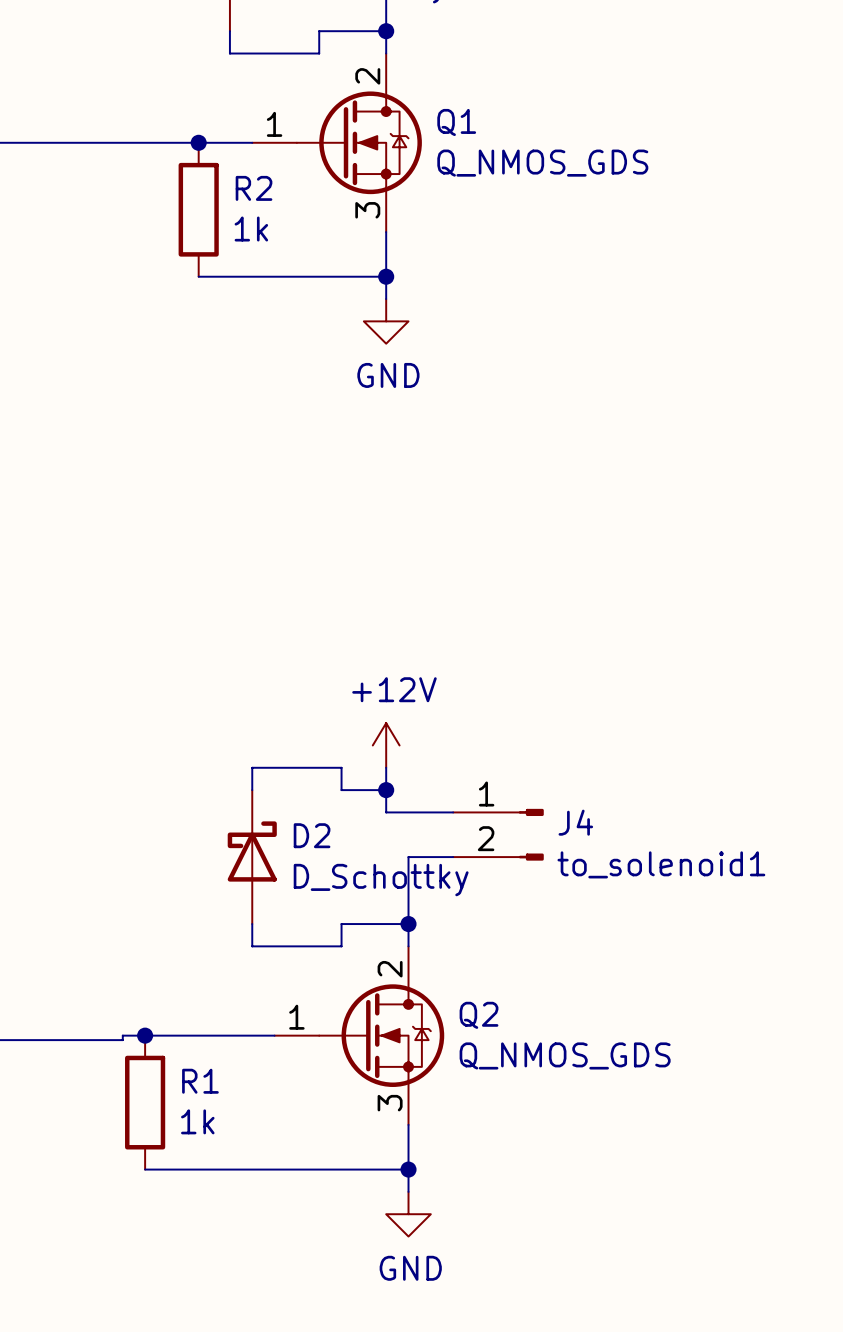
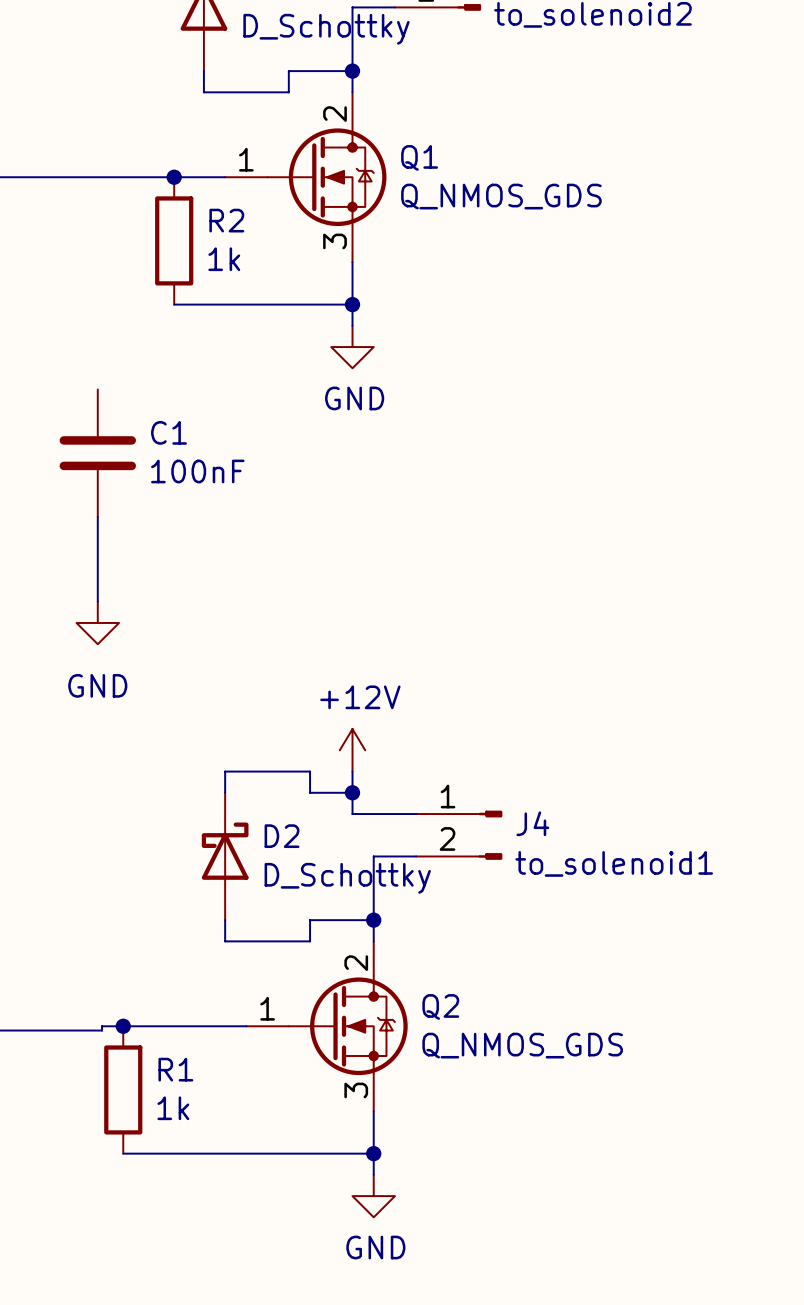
C1: none -> 100nF (97, 453)
wire: none -> (97, 516) (97, 601)
power symbol: none -> GND (97, 622)

